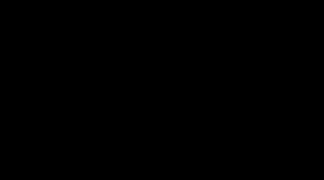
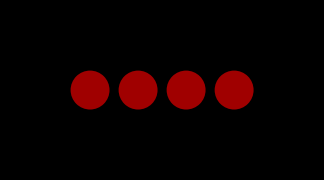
part: none -> (162, 90)

